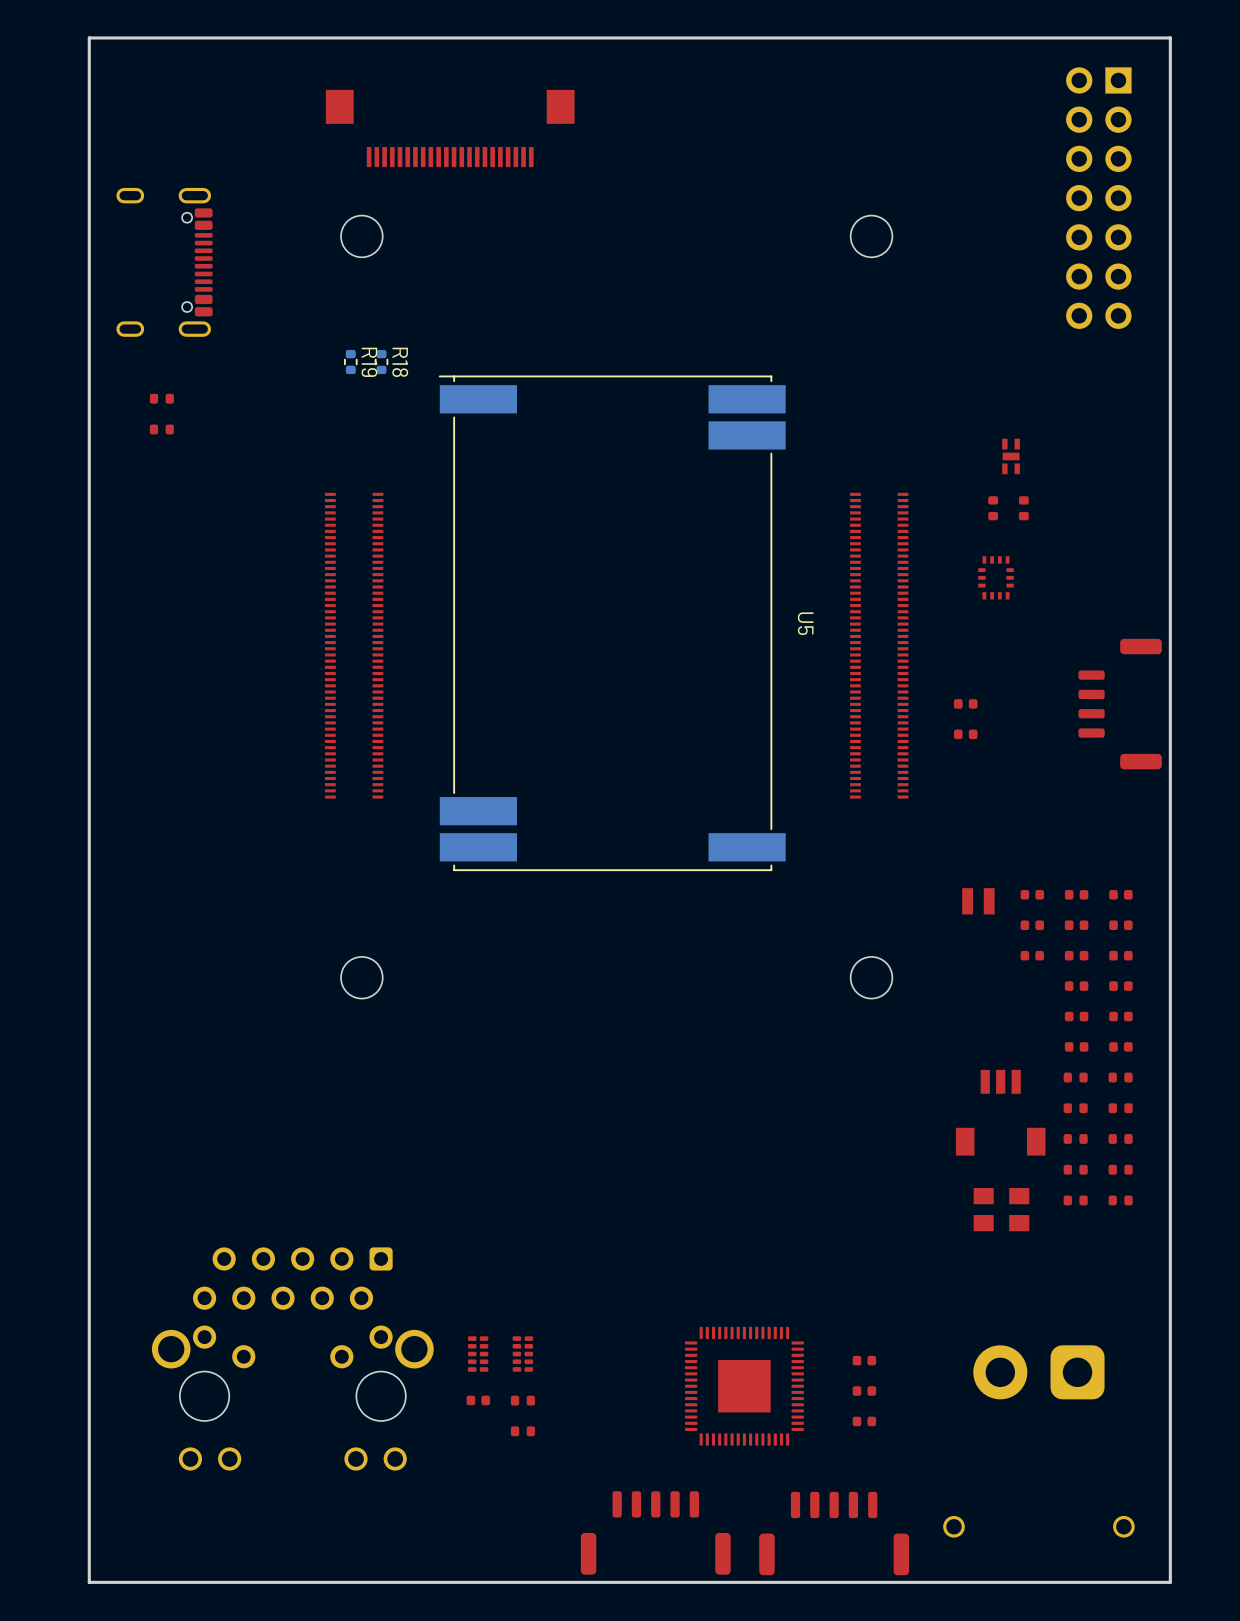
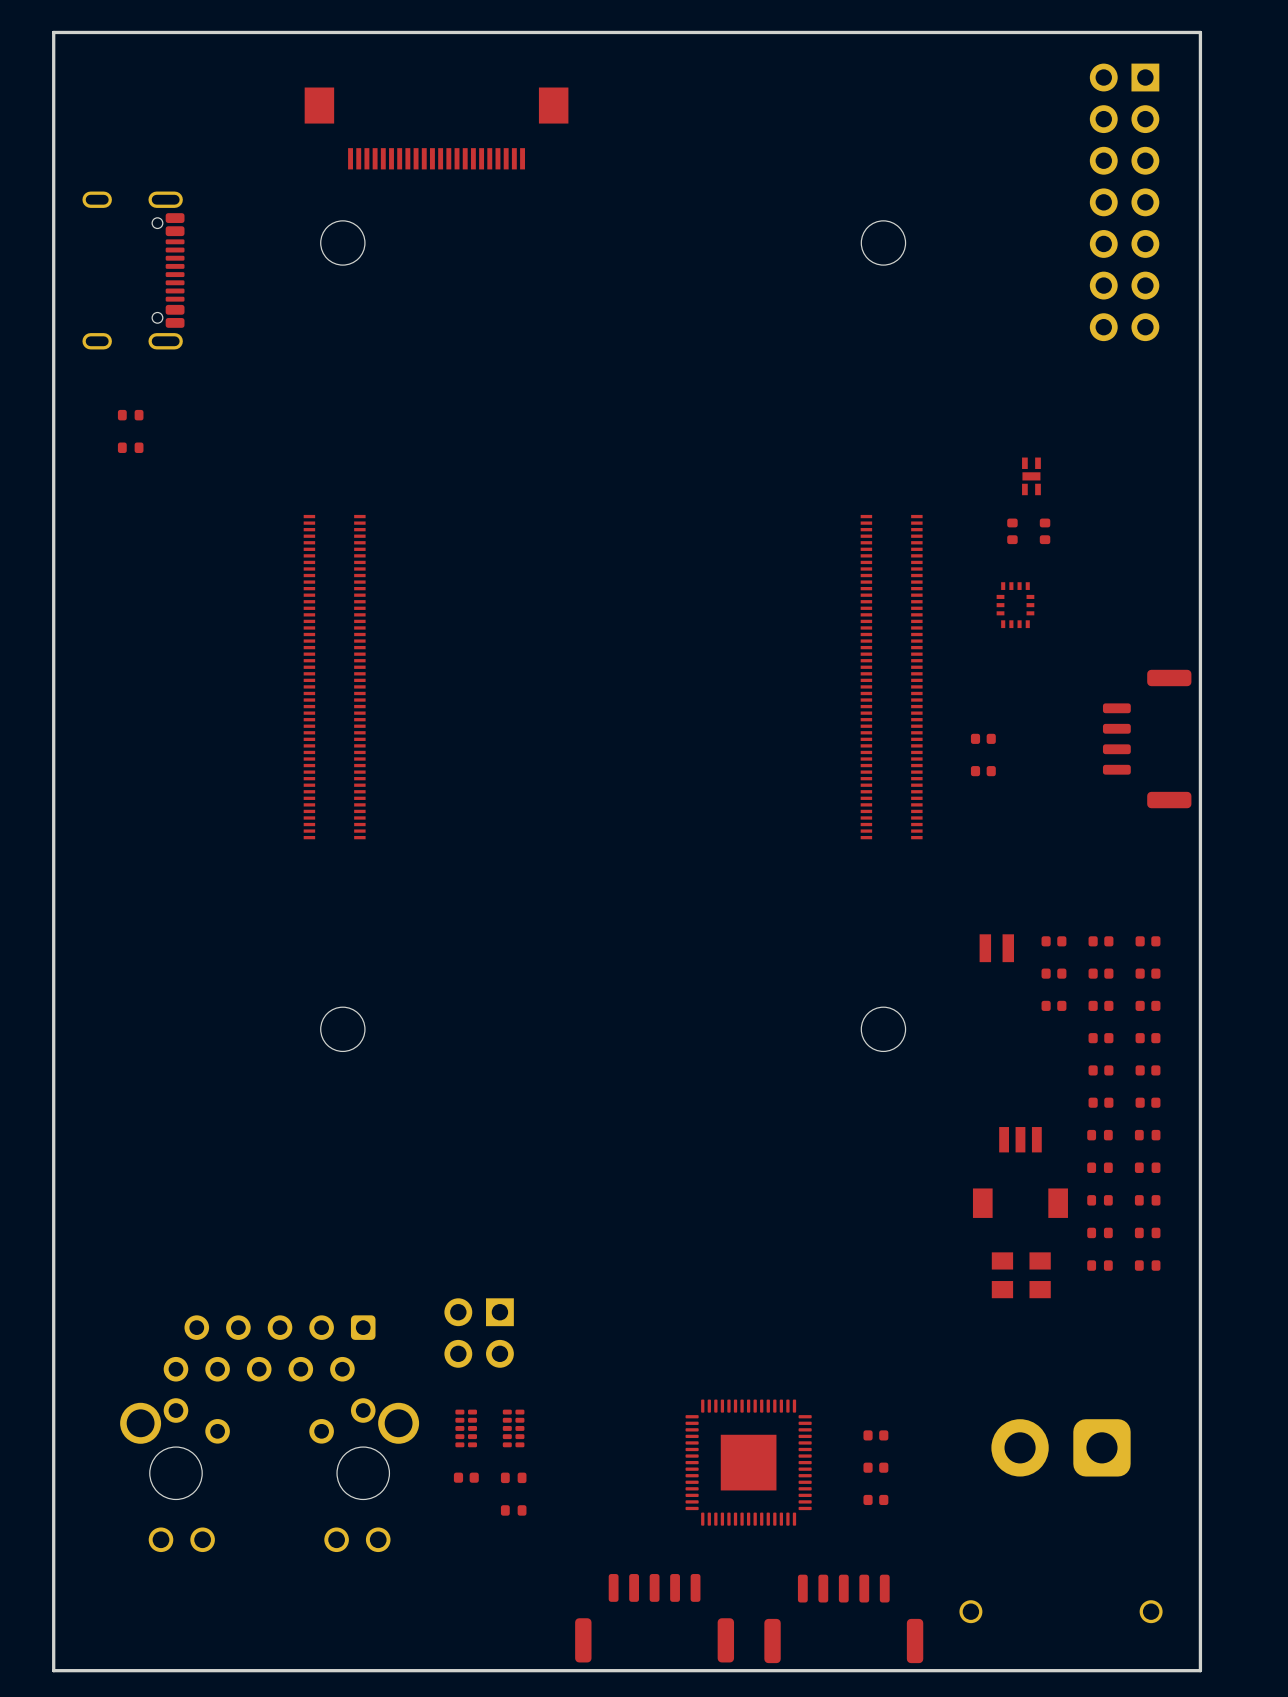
R19: (350, 361) -> none
R18: (381, 361) -> none
U5: (612, 623) -> none
part: none -> (479, 1333)

